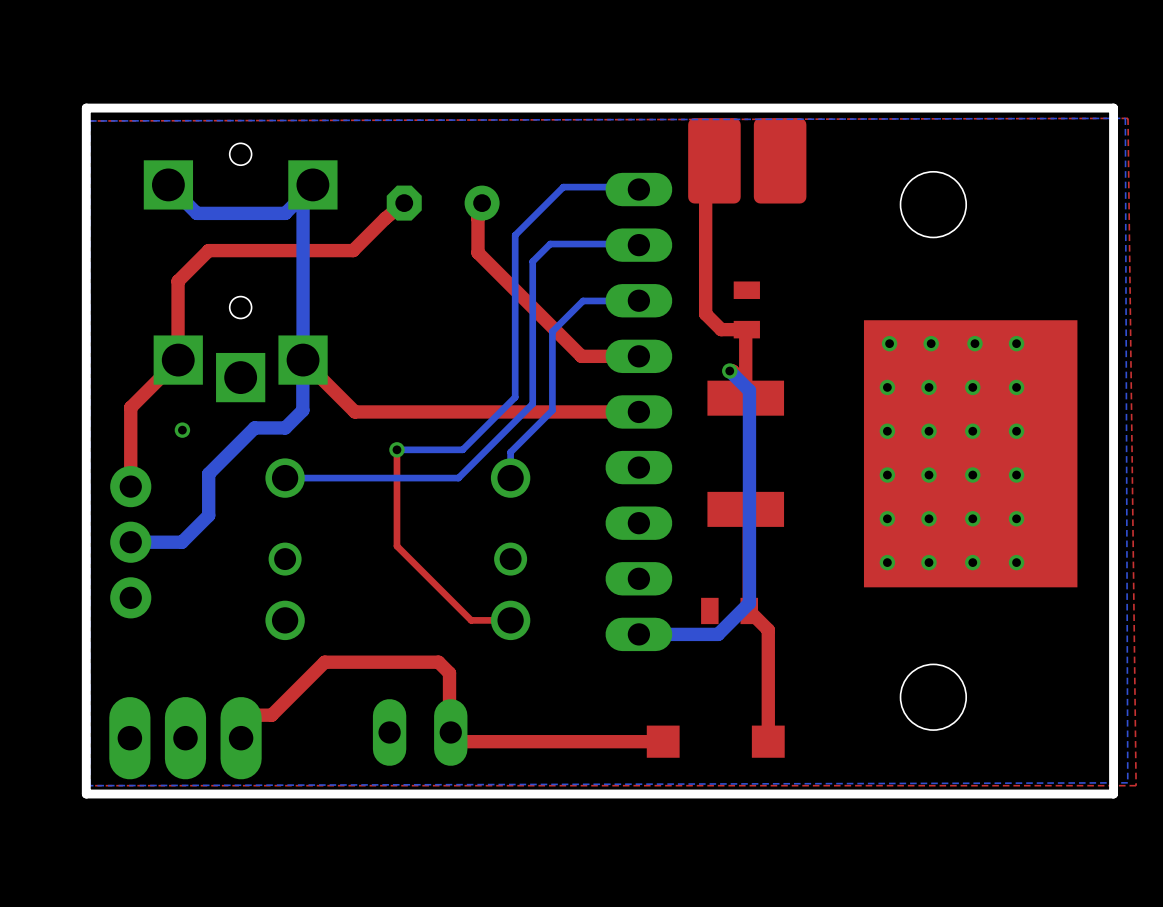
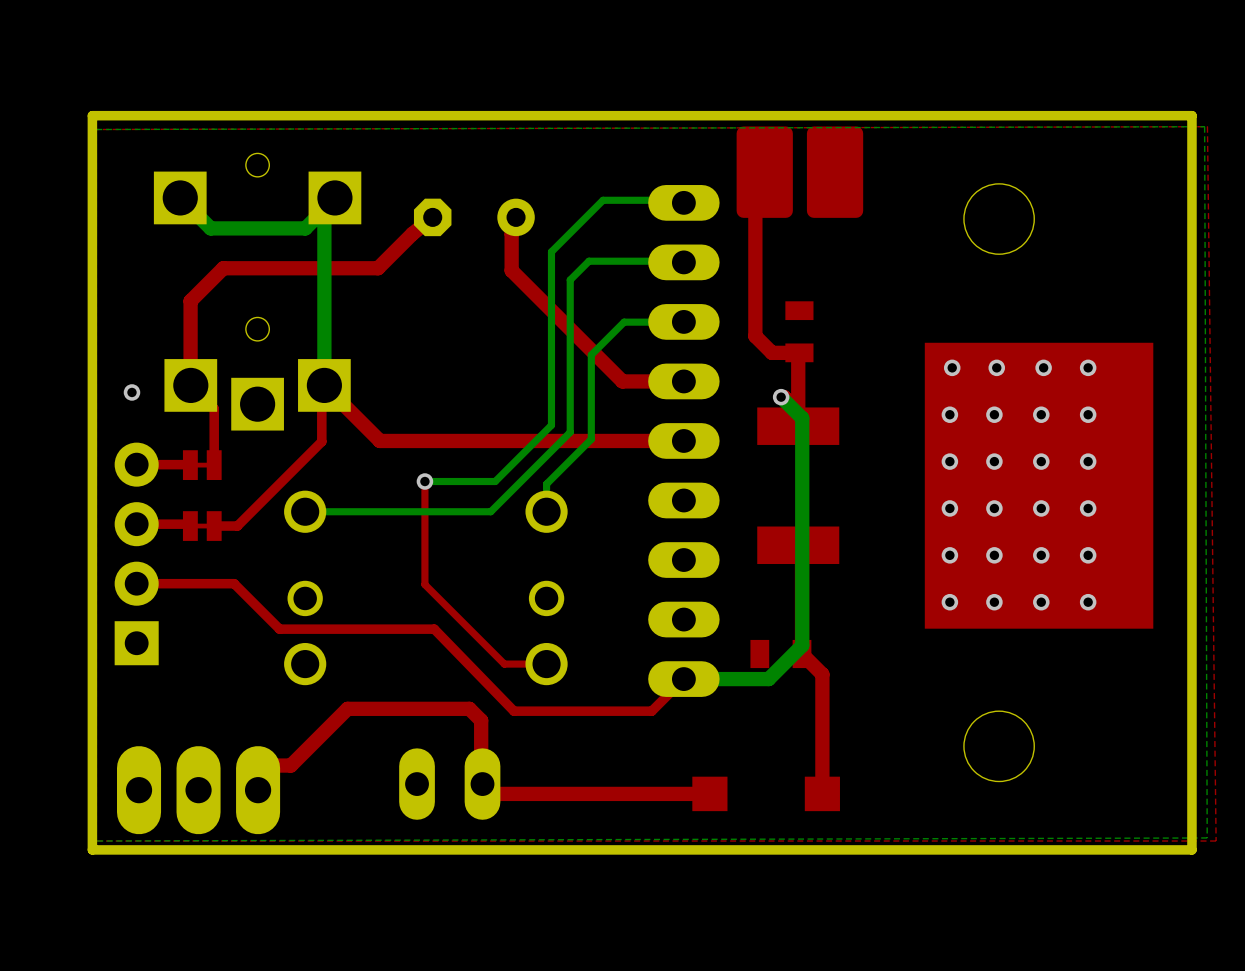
top track: (178, 360) (130, 407) (130, 486) -> (190, 385) (214, 408) (214, 465)
bottom track: (302, 360) (302, 410) (285, 427) (254, 427) (208, 473) (208, 515) (181, 542) (130, 542) -> none
top track: none -> (324, 385) (321, 388) (321, 441) (237, 526) (214, 526)
via position: (182, 430) -> (131, 392)
top track: none -> (136, 464) (190, 465)
part: none -> (202, 465)
top track: none -> (136, 524) (190, 524) (190, 526)
part: none -> (202, 526)
part: none -> (136, 553)
part: (130, 542) -> none
top track: none -> (136, 583) (234, 583) (279, 629) (434, 629) (513, 711) (651, 711) (683, 679)

